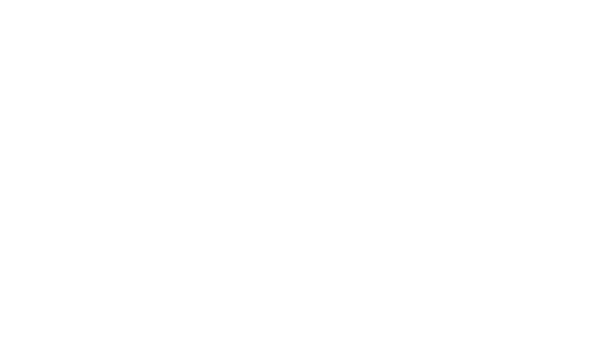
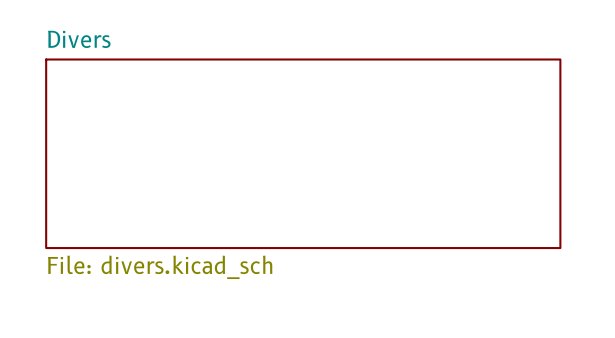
sheet Divers: none -> File: divers.kicad_sch (303, 153)

